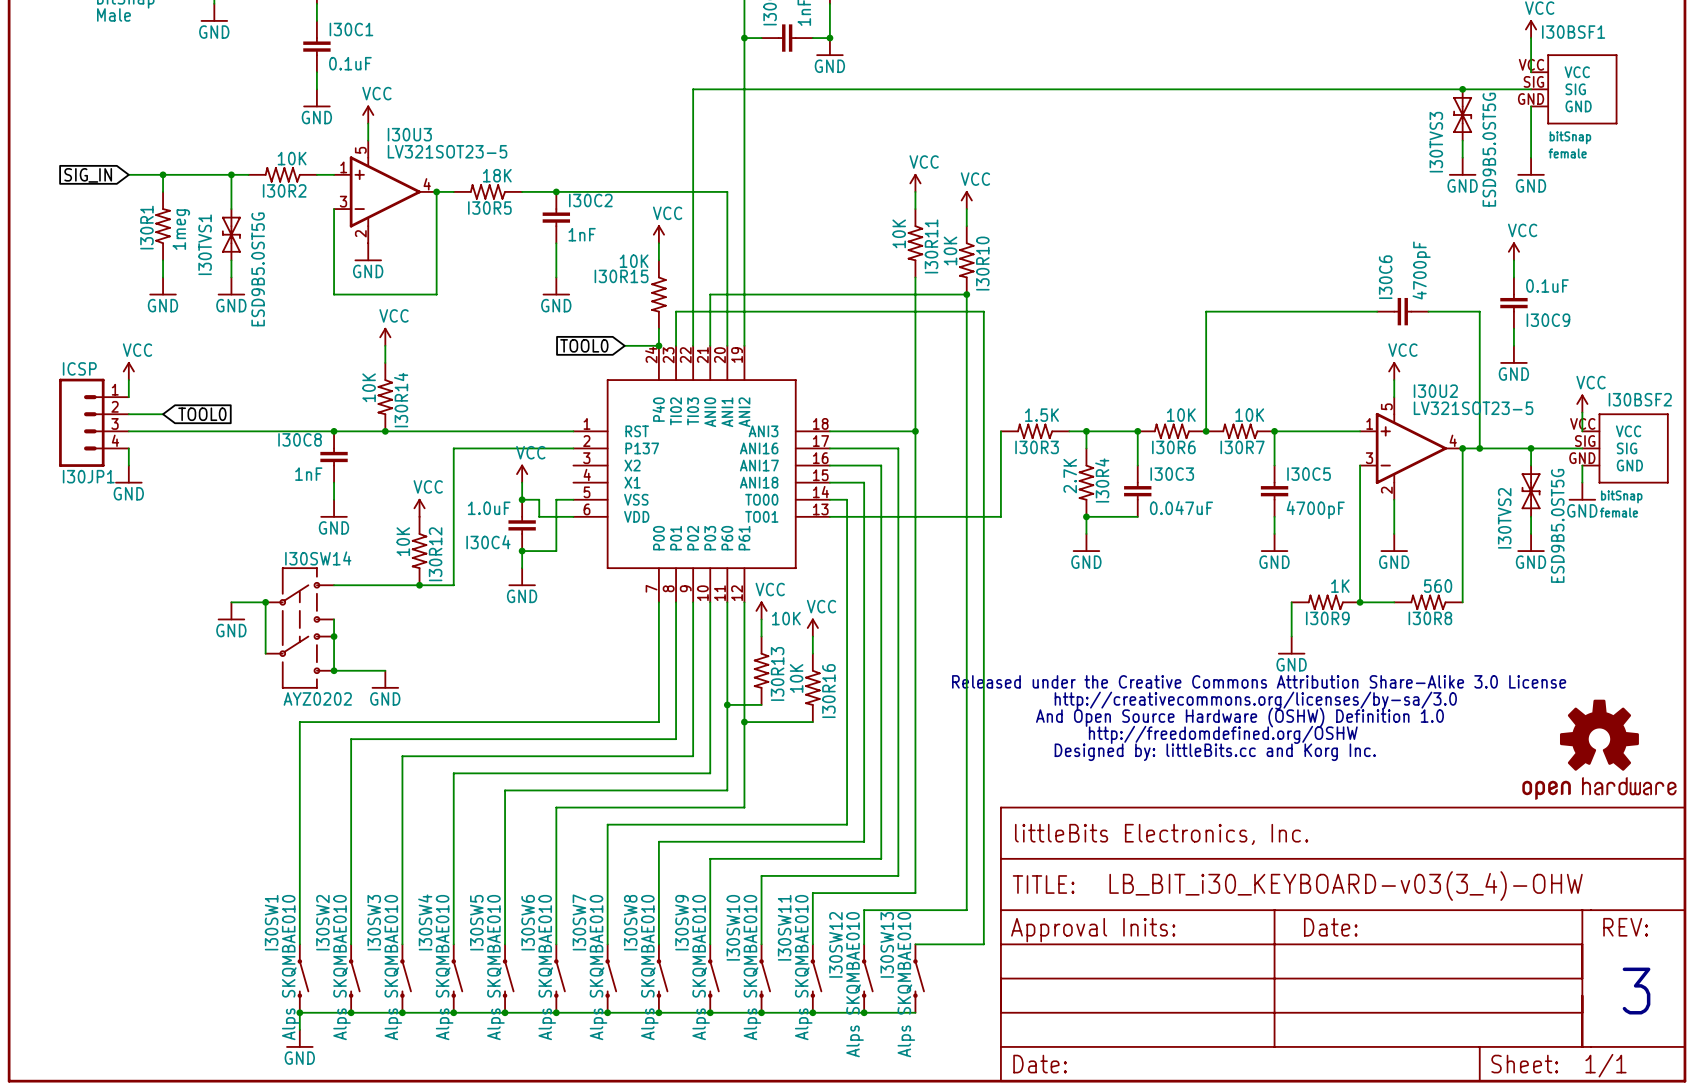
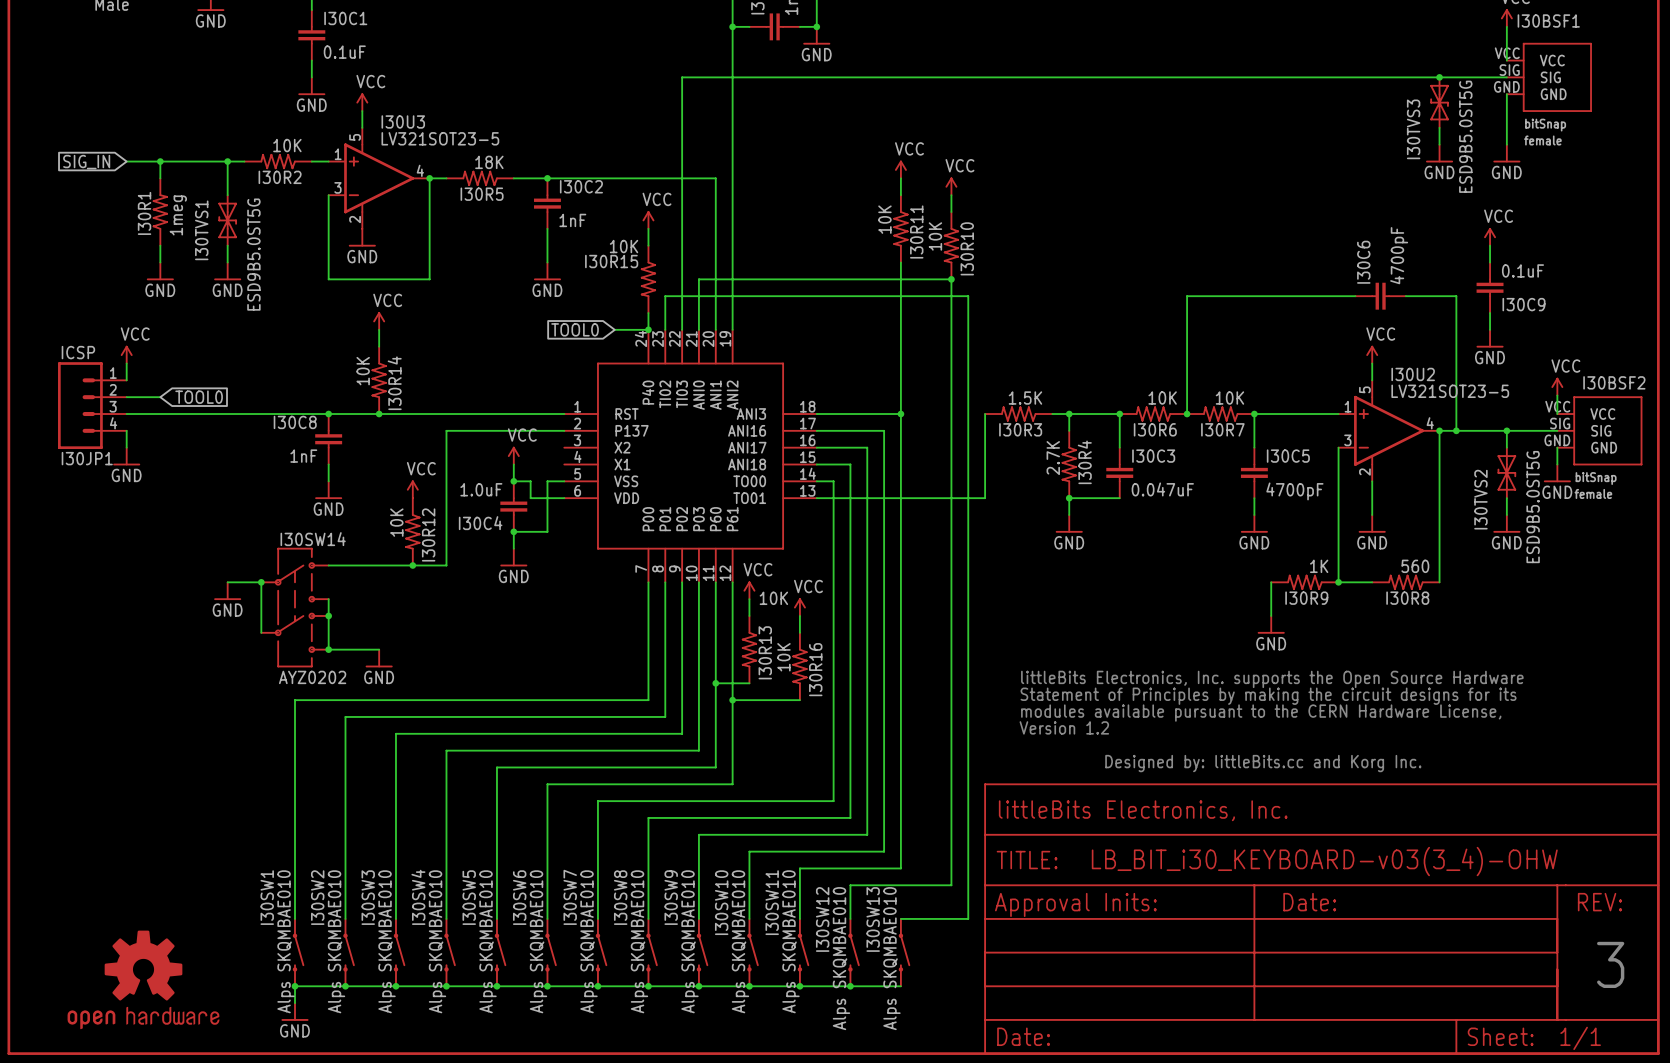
part: (1259, 718) -> none
part: none -> (1271, 721)
part: (1599, 749) -> none
part: none -> (143, 979)

